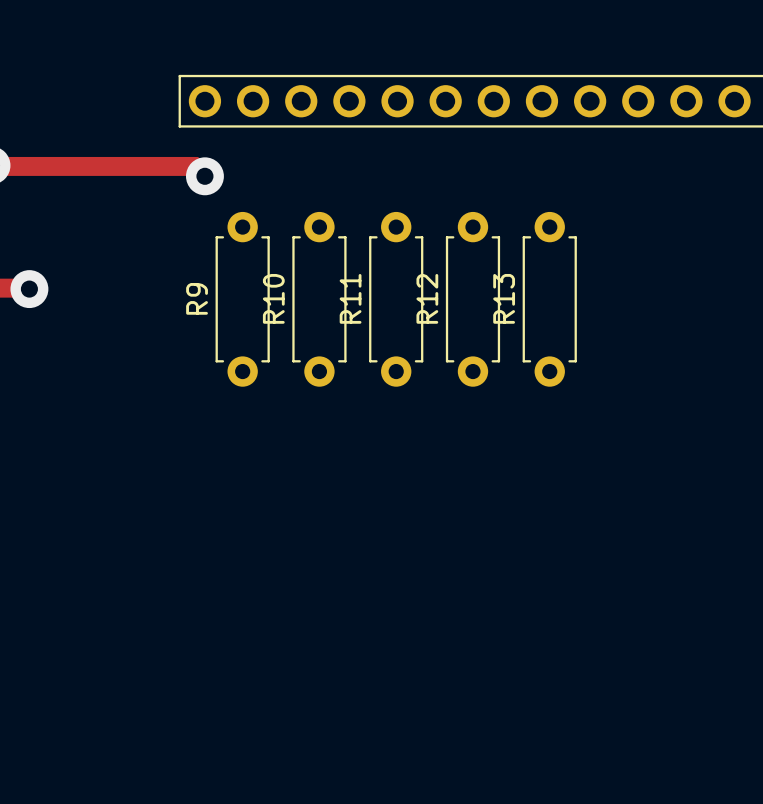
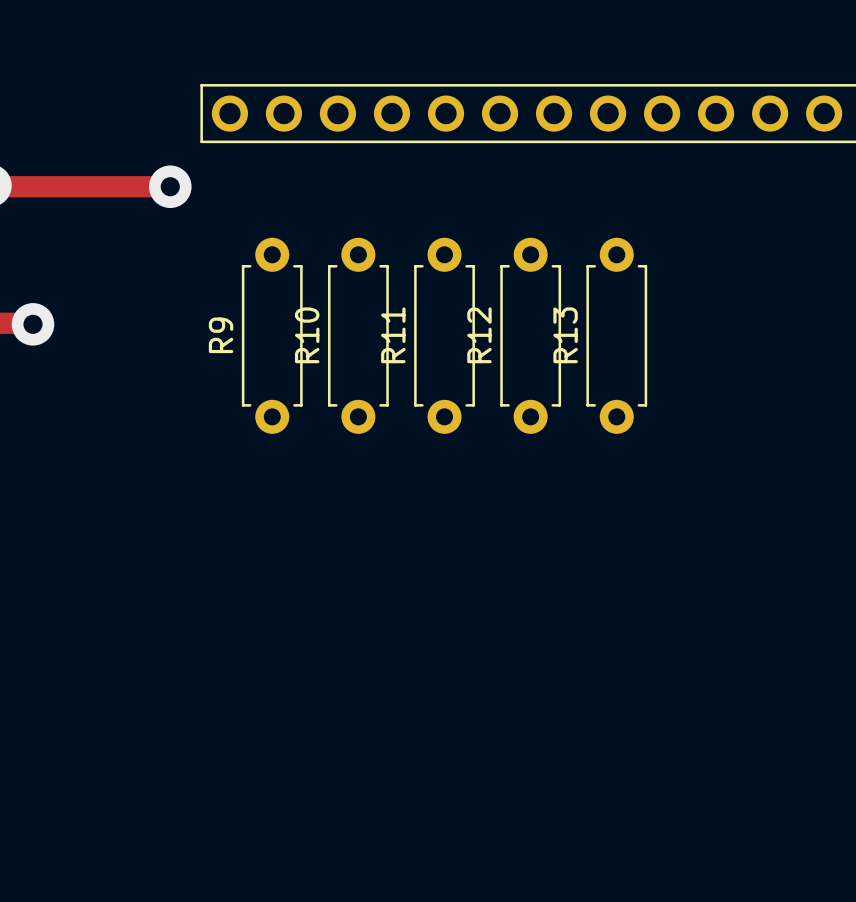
track: (151, 166) (195, 166) (204, 176) -> none
via position: (204, 176) -> (170, 186)

